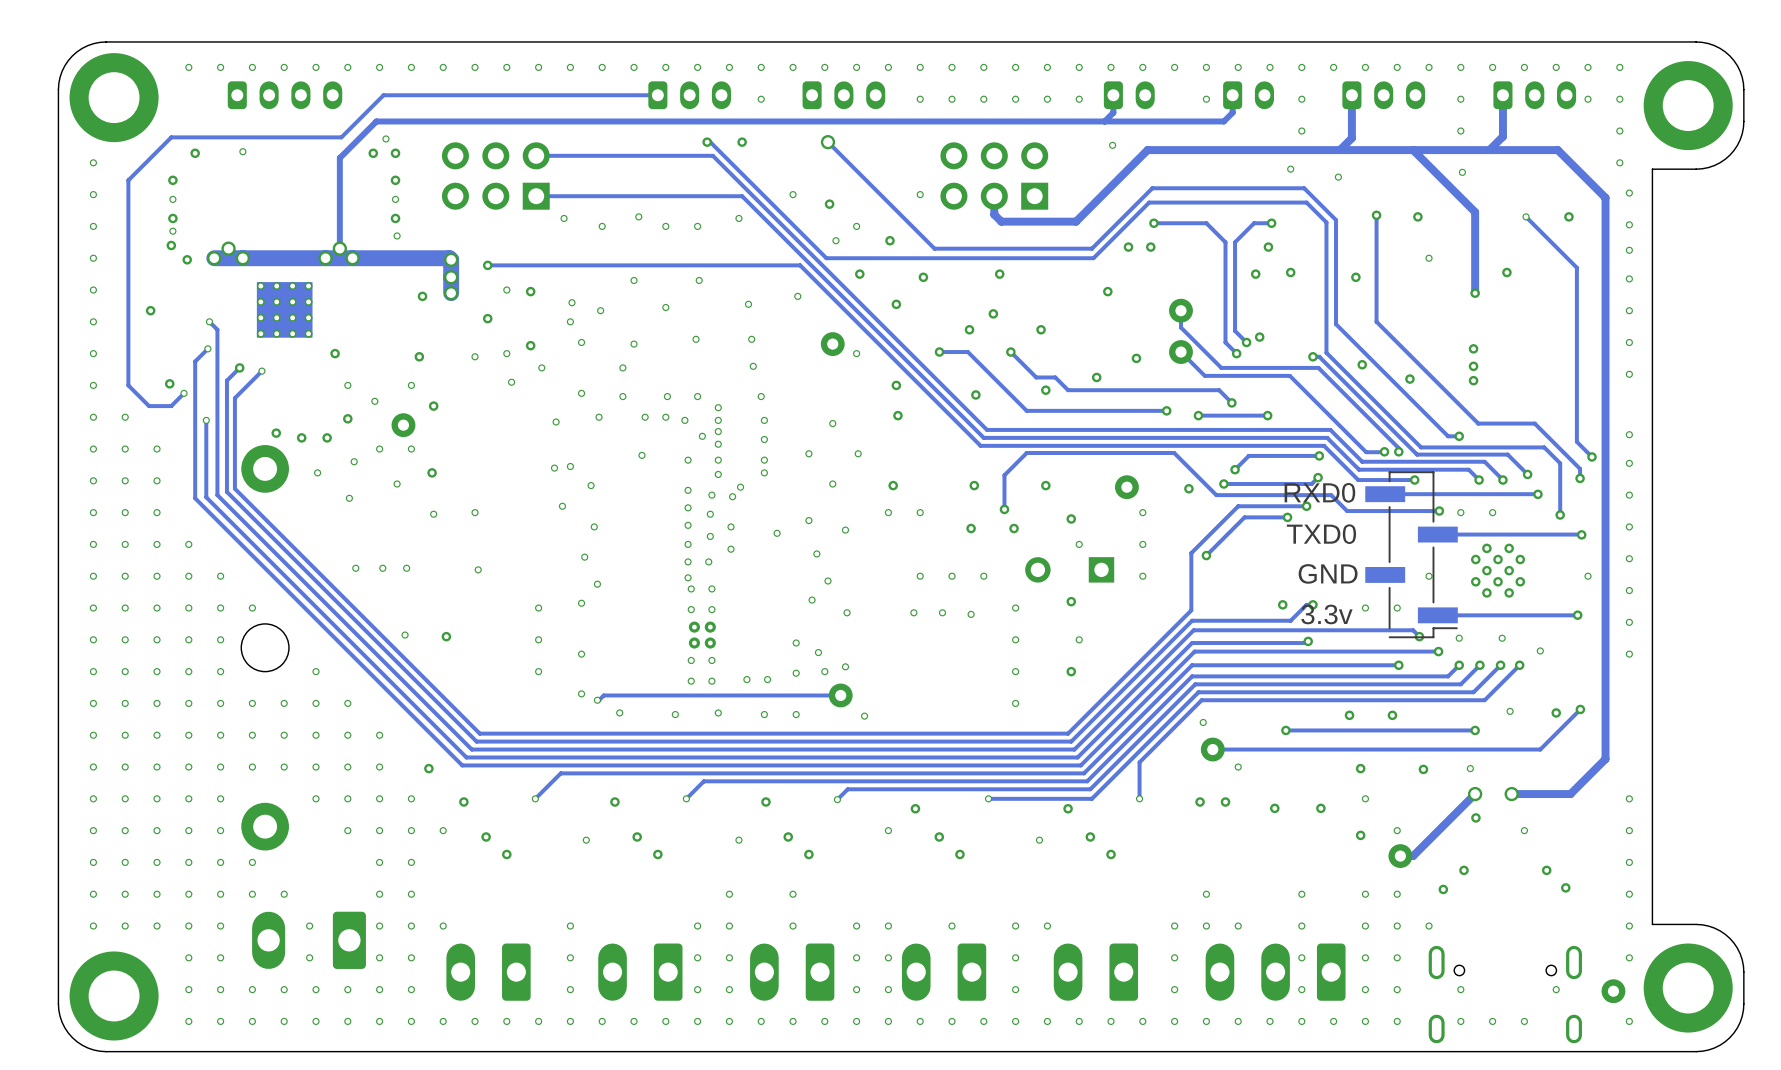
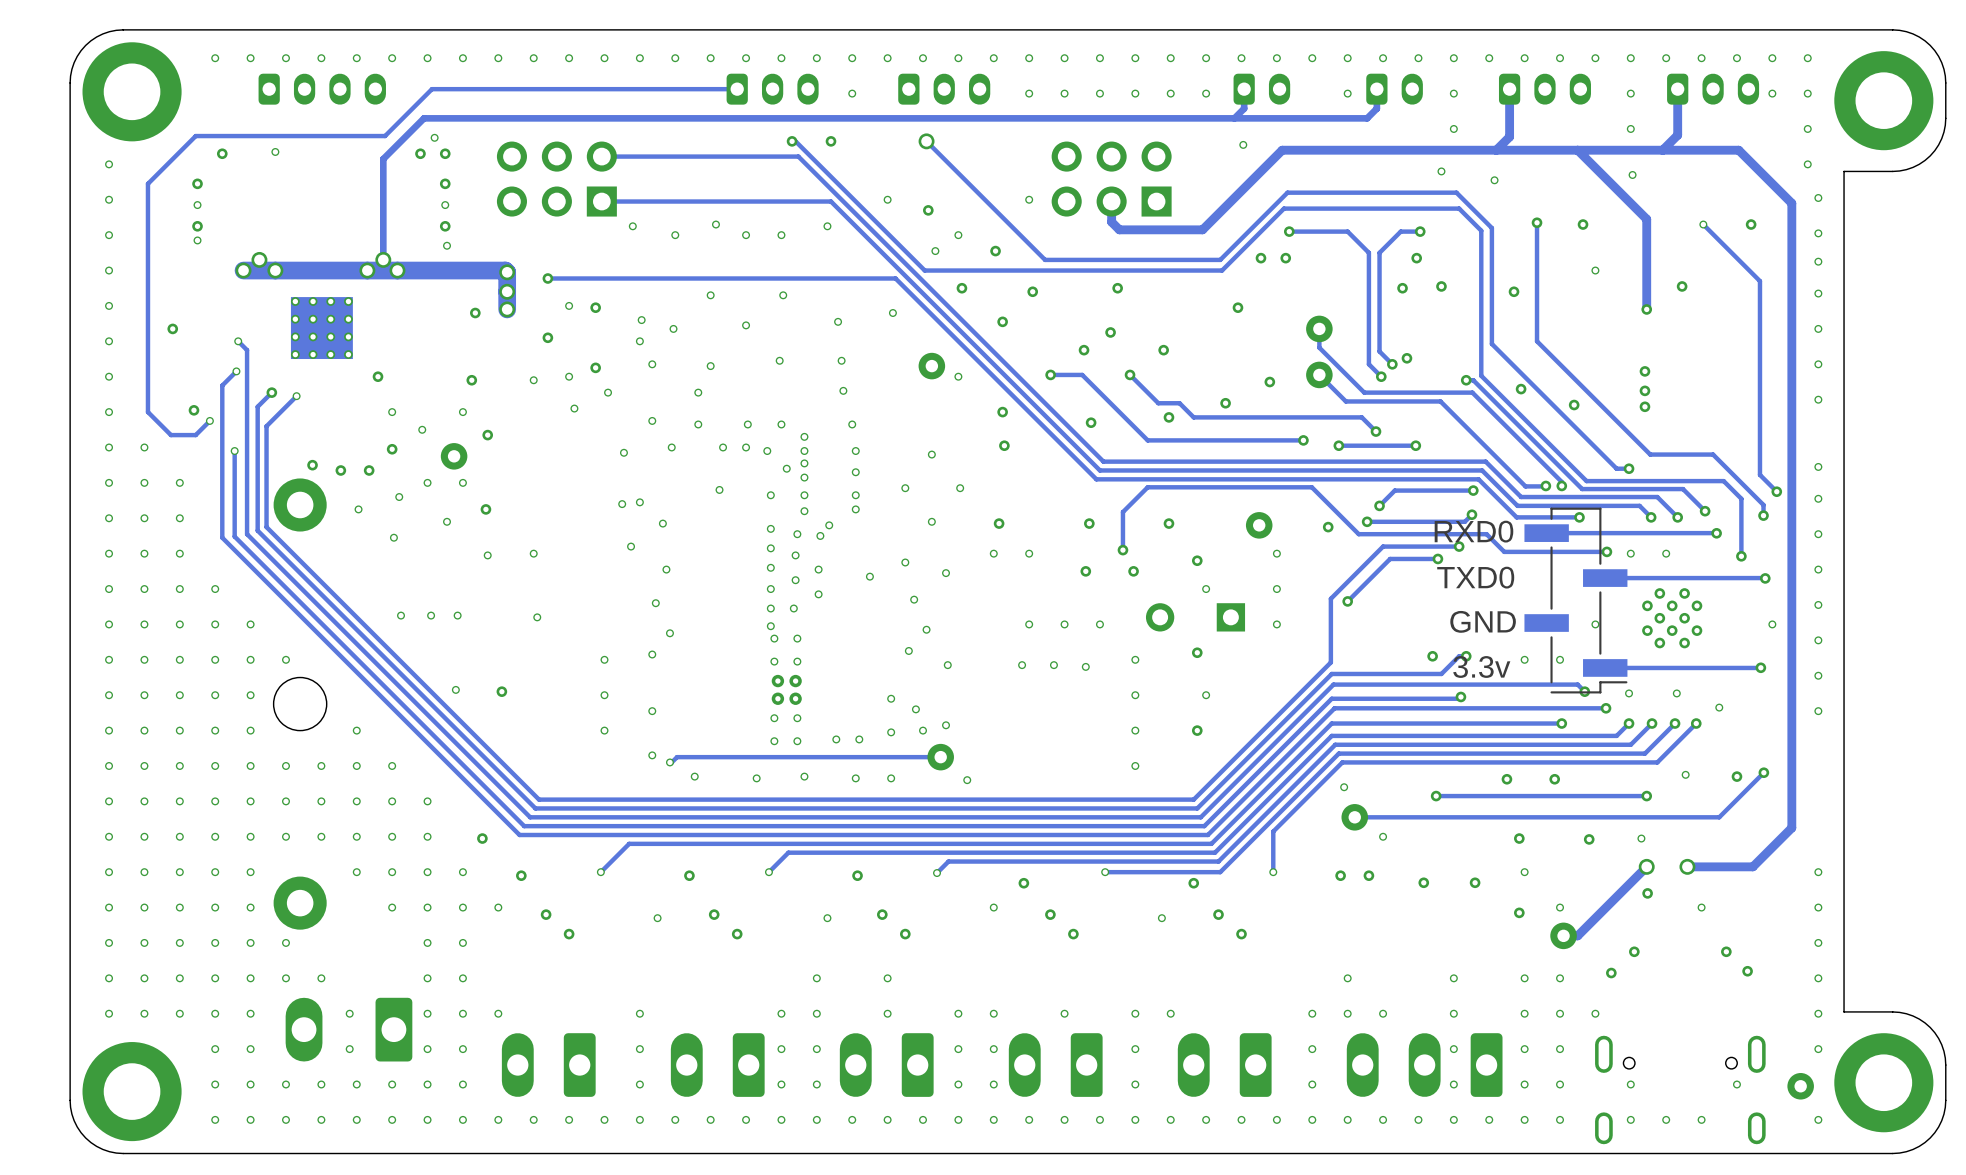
via: (171, 245) -> none
via: (187, 259) -> none

